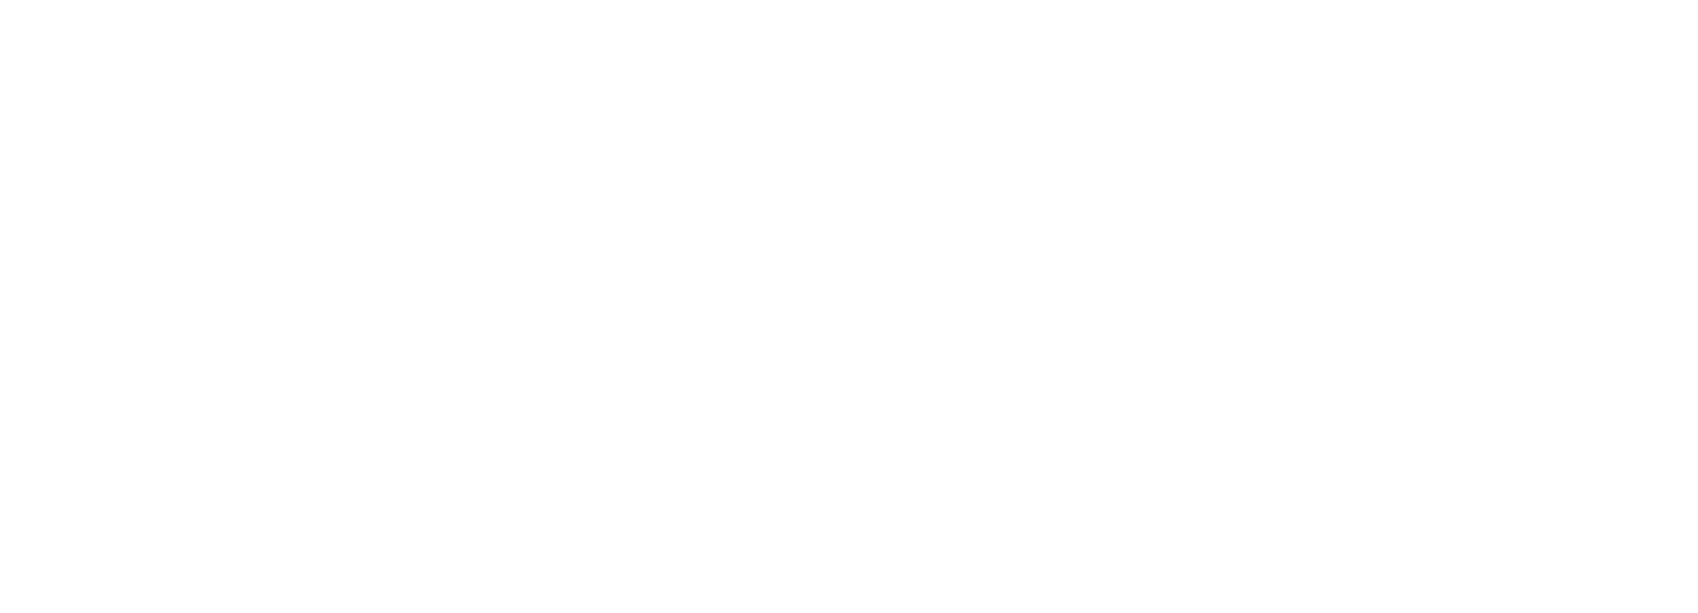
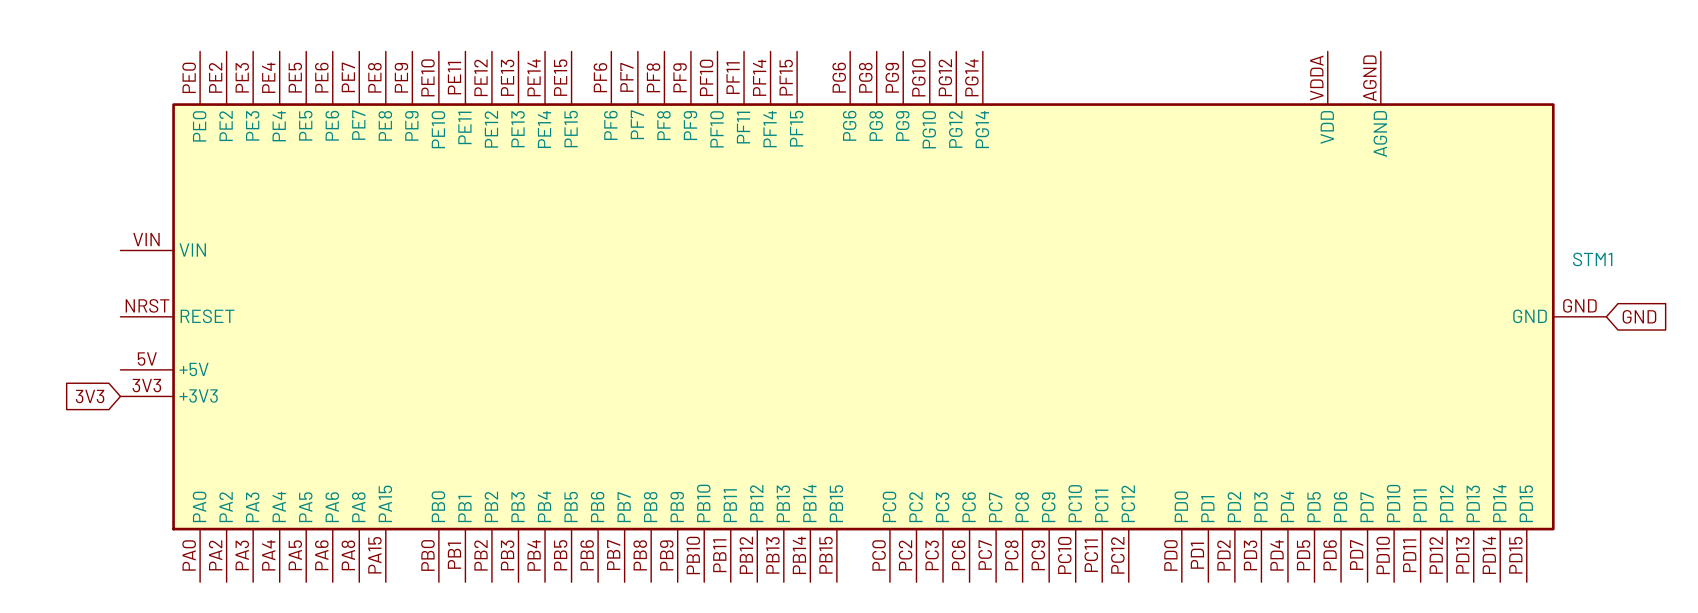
STM1: none -> (863, 316)
global label: none -> GND (1639, 316)
global label: none -> 3V3 (90, 396)

